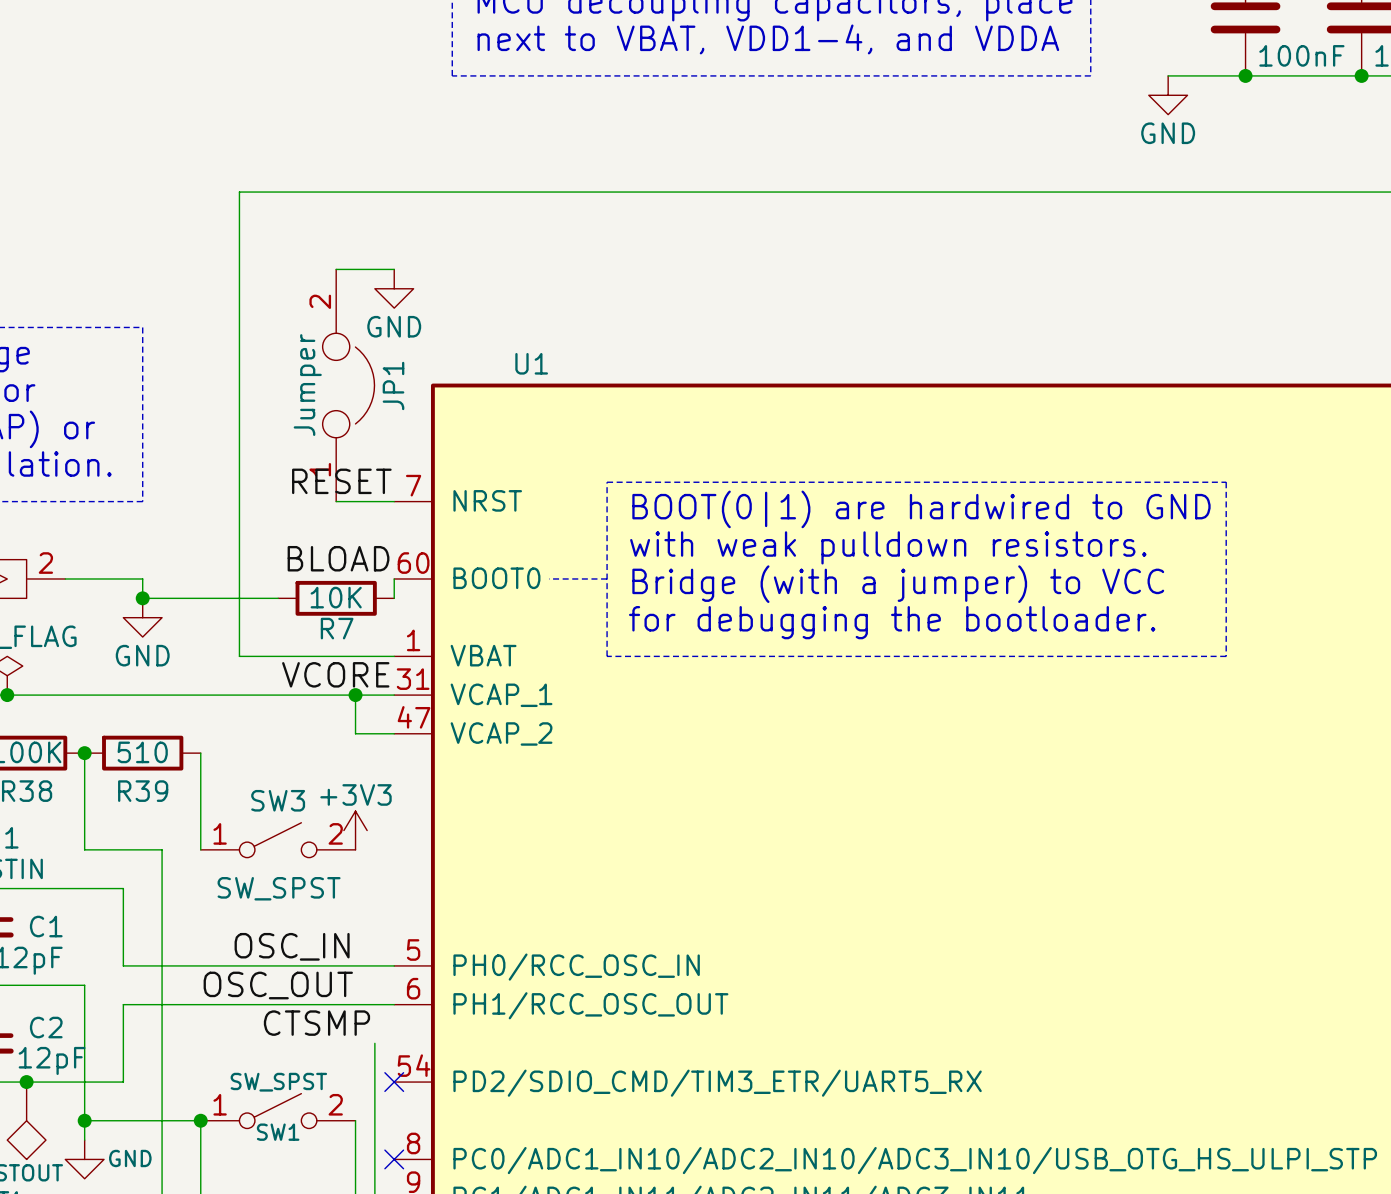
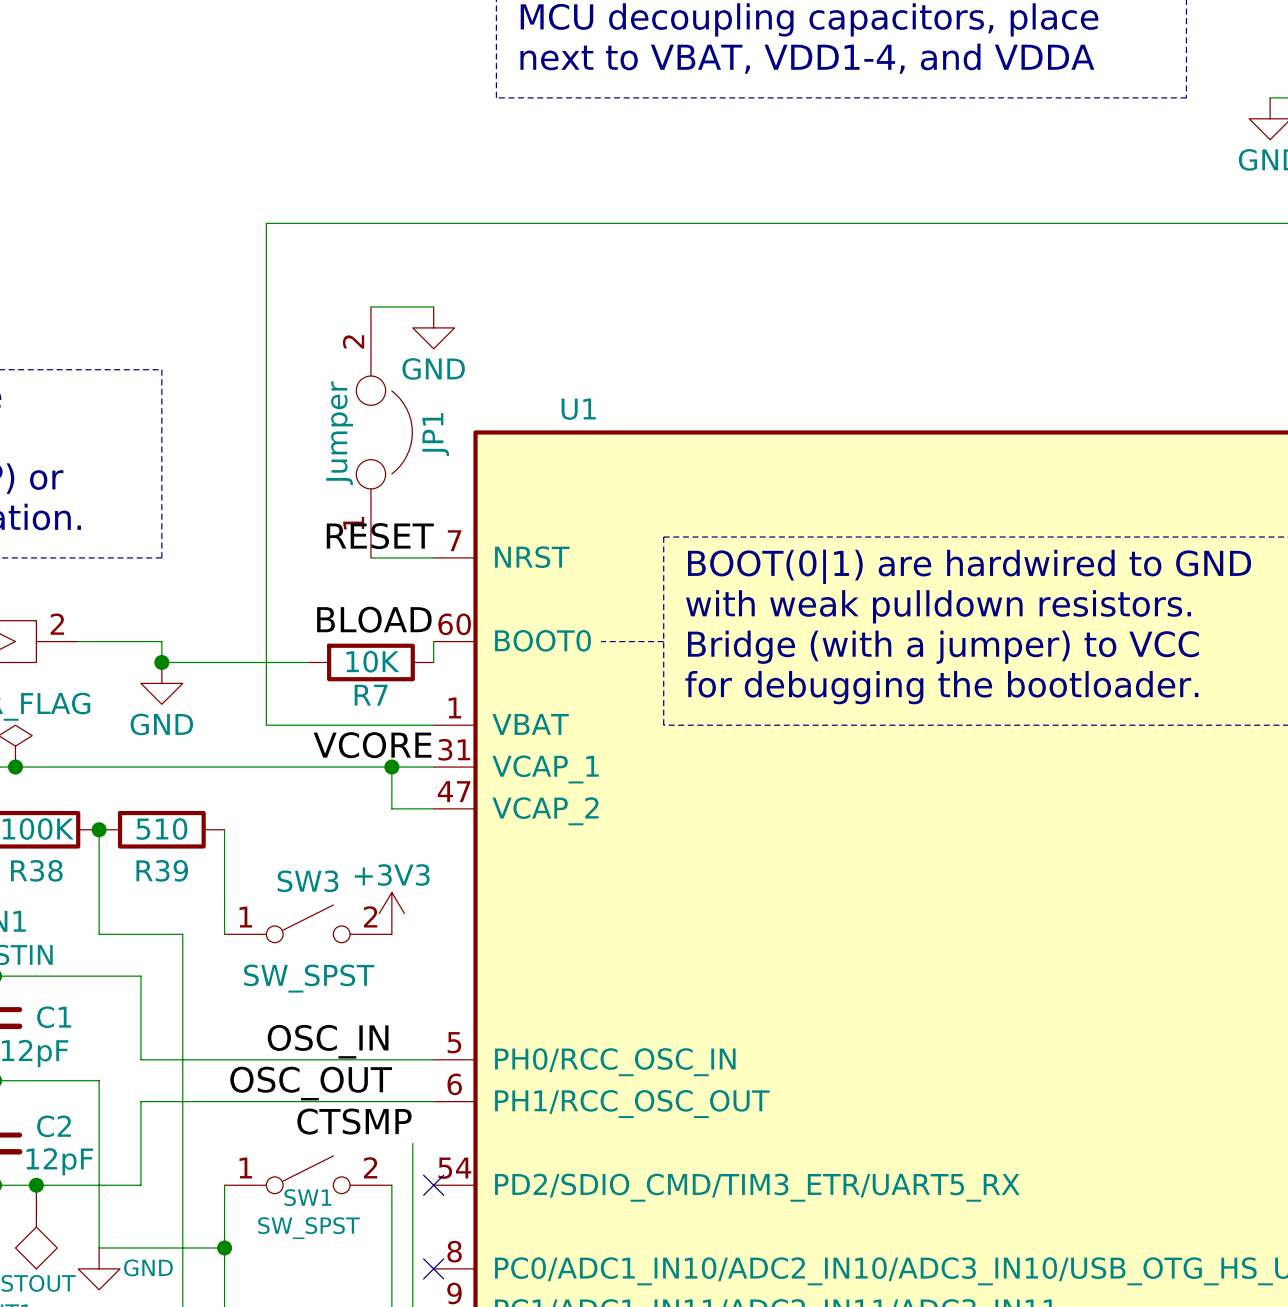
SW1 value position: SW_SPST (278, 1082) -> SW_SPST (308, 1228)
wire: none -> (391, 1185) (391, 1227)
SW1 position: (278, 1111) -> (308, 1174)
wire: (84, 1120) (200, 1120) -> (224, 1185) (224, 1227)
junction: (84, 1120) -> none
junction position: (200, 1120) -> (224, 1247)
wire: none -> (99, 1247) (224, 1247)

